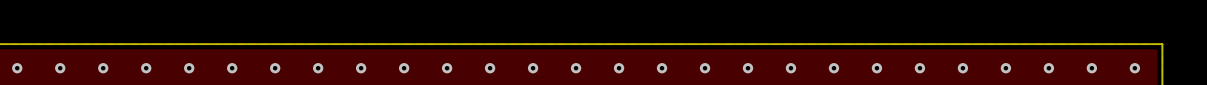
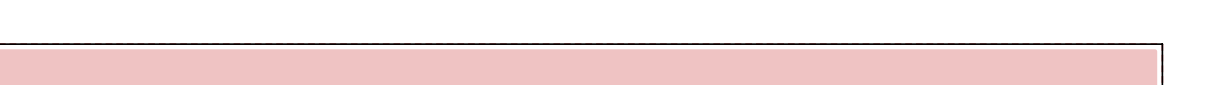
via: (17, 68) -> none
via: (60, 68) -> none
via: (103, 68) -> none
via: (146, 68) -> none
via: (189, 68) -> none
via: (232, 68) -> none
via: (275, 68) -> none
via: (318, 68) -> none
via: (361, 68) -> none
via: (404, 68) -> none
via: (447, 68) -> none
via: (490, 68) -> none
via: (533, 68) -> none
via: (576, 68) -> none
via: (619, 68) -> none
via: (662, 68) -> none
via: (705, 68) -> none
via: (748, 68) -> none
via: (790, 68) -> none
via: (833, 68) -> none
via: (876, 68) -> none
via: (919, 68) -> none
via: (962, 68) -> none
via: (1005, 68) -> none
via: (1048, 68) -> none
via: (1091, 68) -> none
via: (1134, 68) -> none

